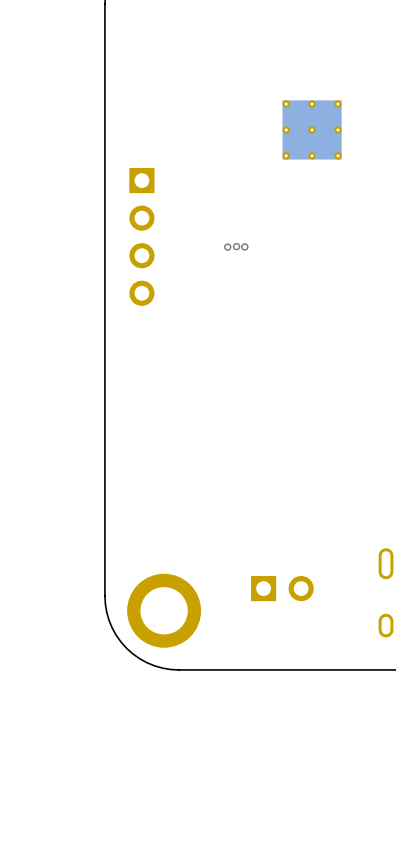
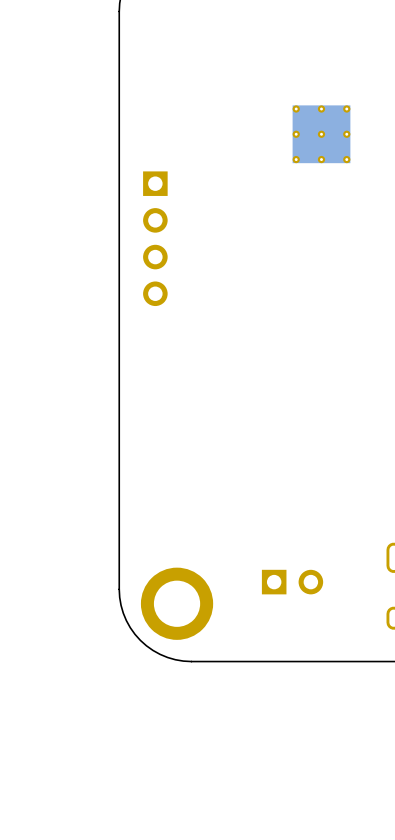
via: (236, 246) -> none
via: (244, 246) -> none
via: (227, 247) -> none

